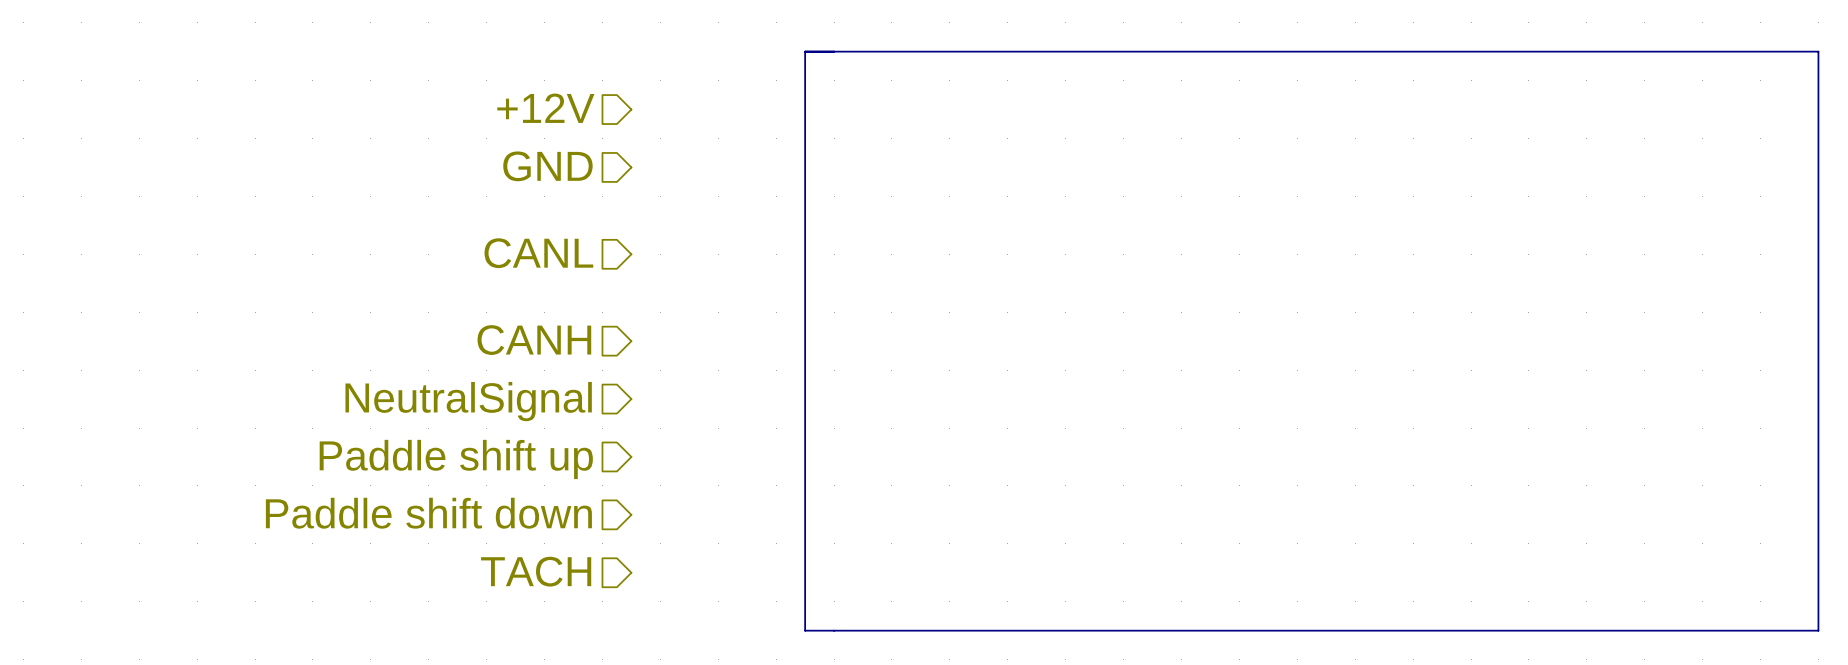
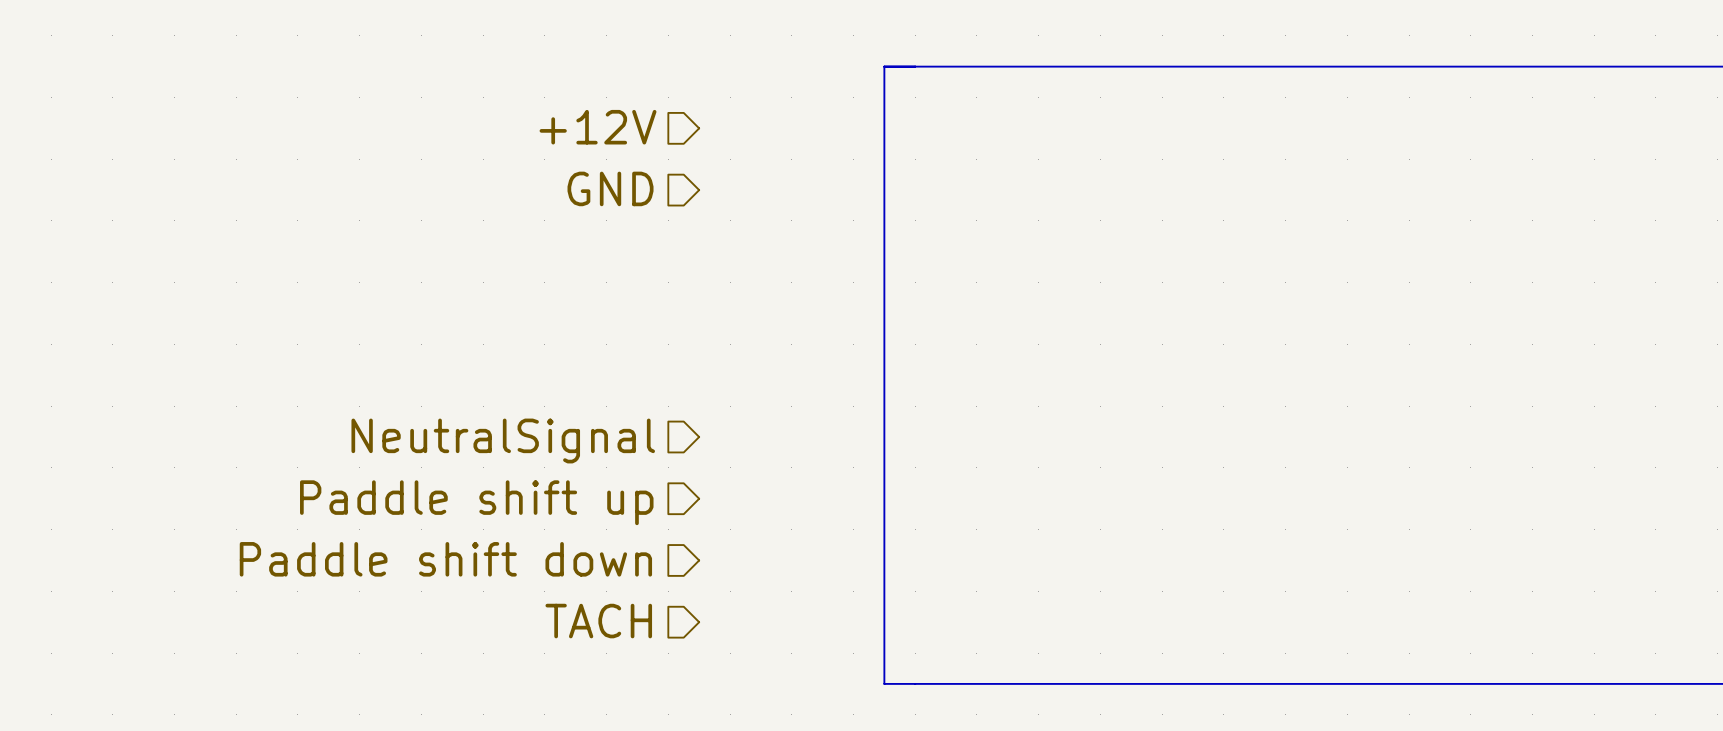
hierarchical label: CANL (538, 253) -> none
hierarchical label: CANH (534, 340) -> none

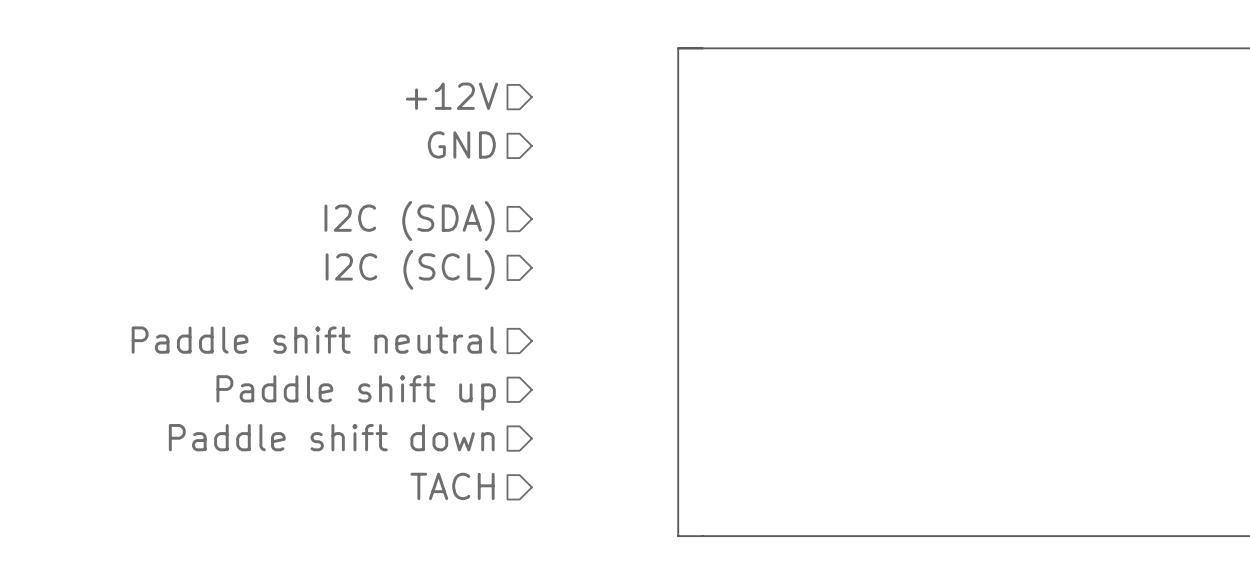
hierarchical label: none -> I2C (SDA) (409, 221)
hierarchical label: none -> I2C (SCL) (410, 269)
hierarchical label: NeutralSignal (503, 441) -> Paddle shift neutral (314, 340)

